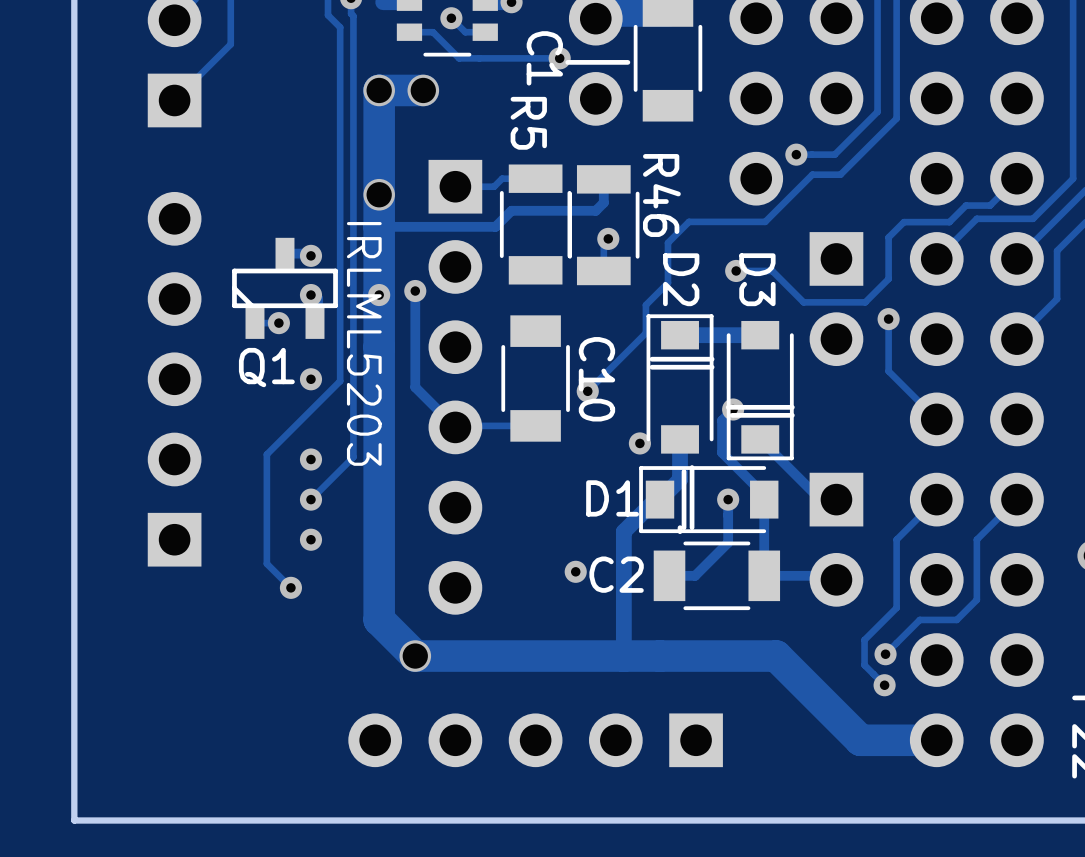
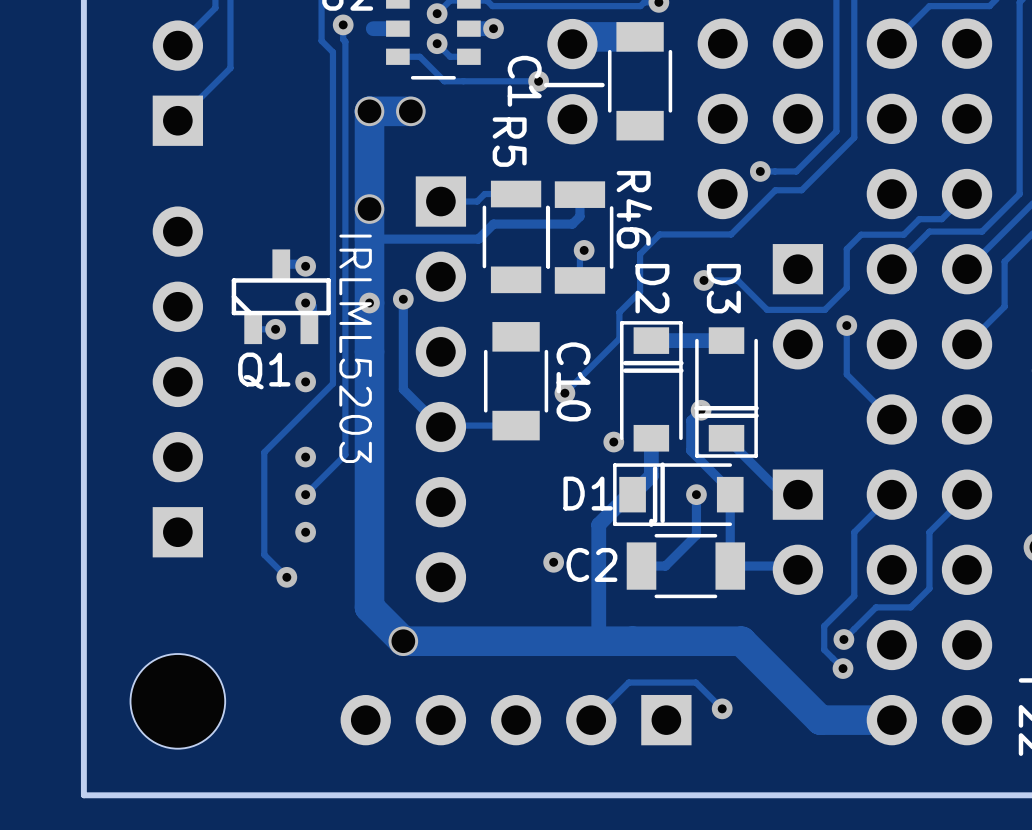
part: none -> (177, 701)
track: none -> (722, 708) (695, 682) (628, 682) (591, 720)
via: none -> (722, 708)

